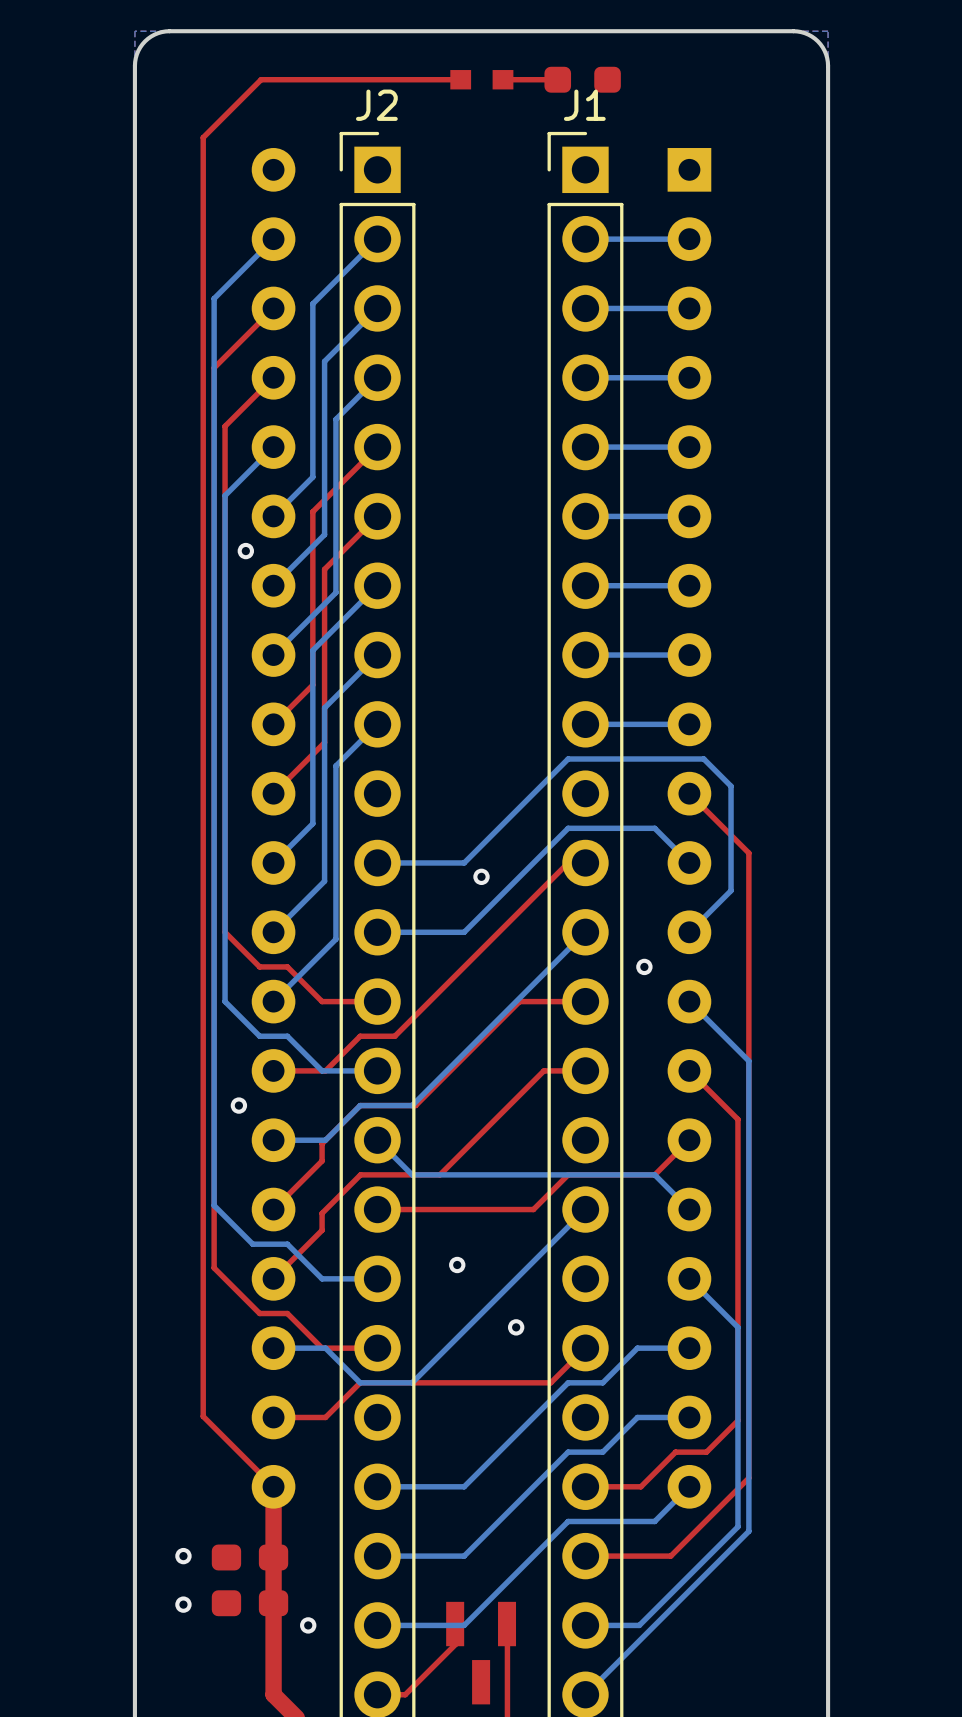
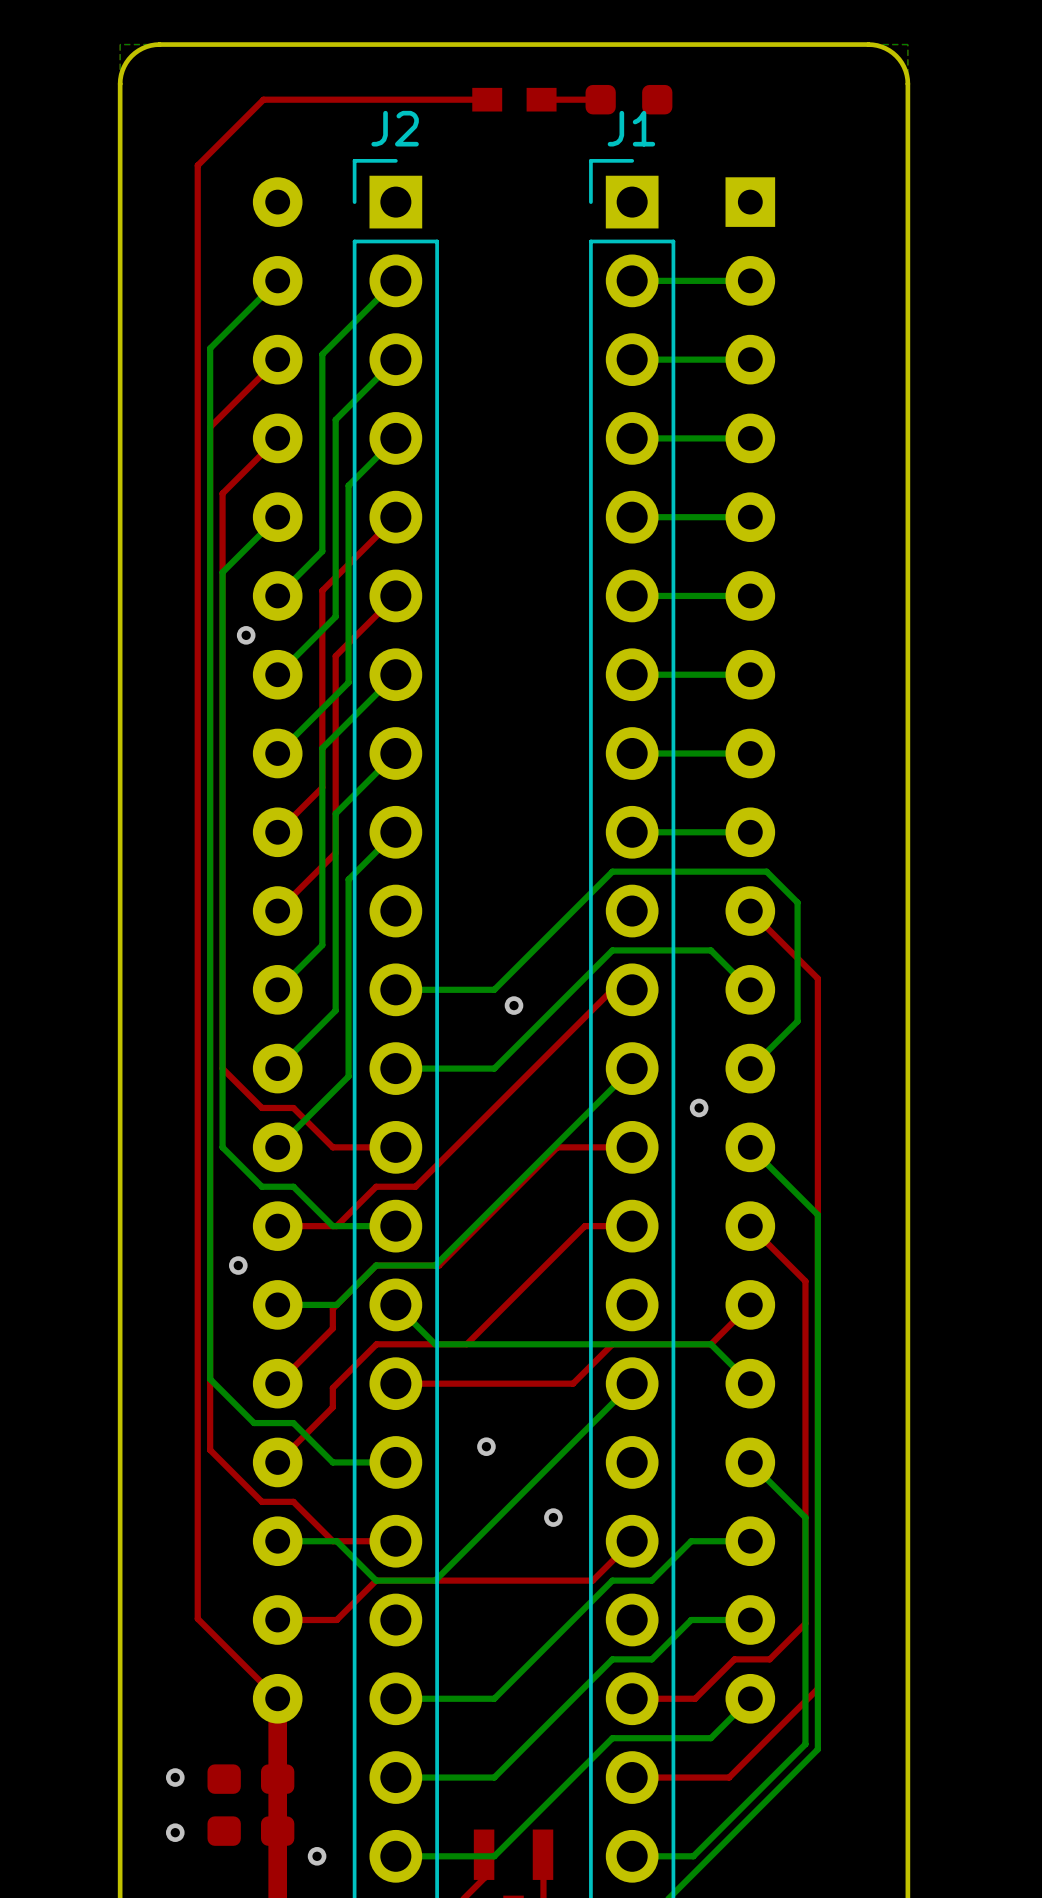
part footprint: [450, 70, 514, 90] -> [472, 87, 557, 112]

